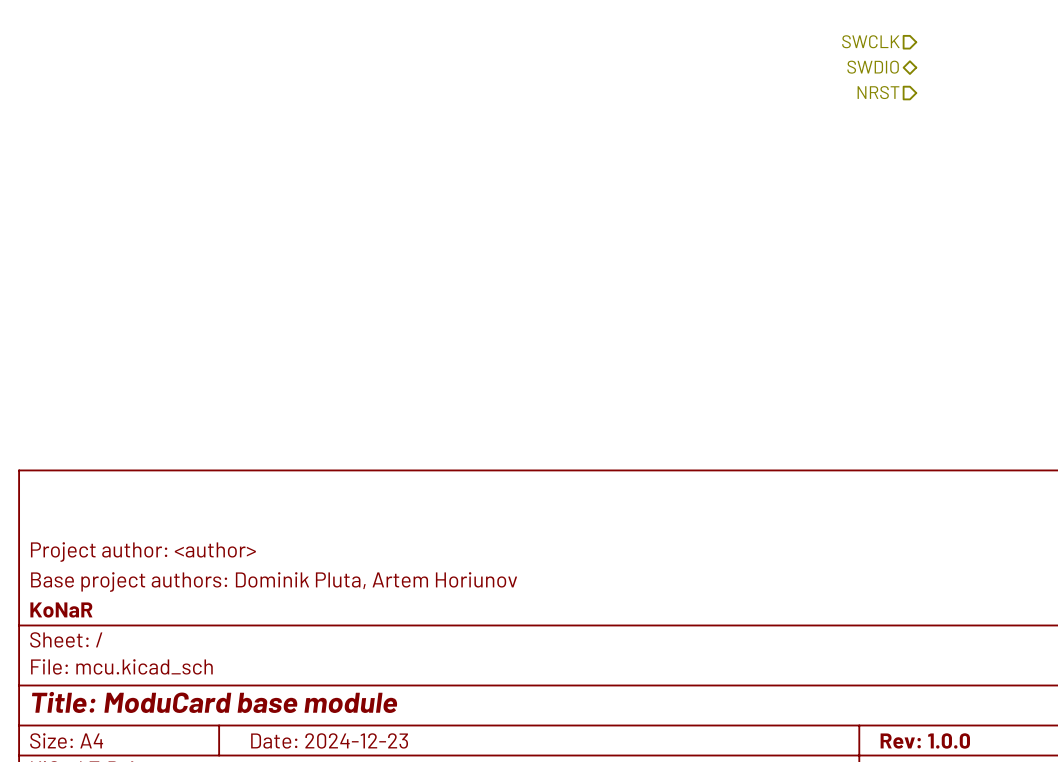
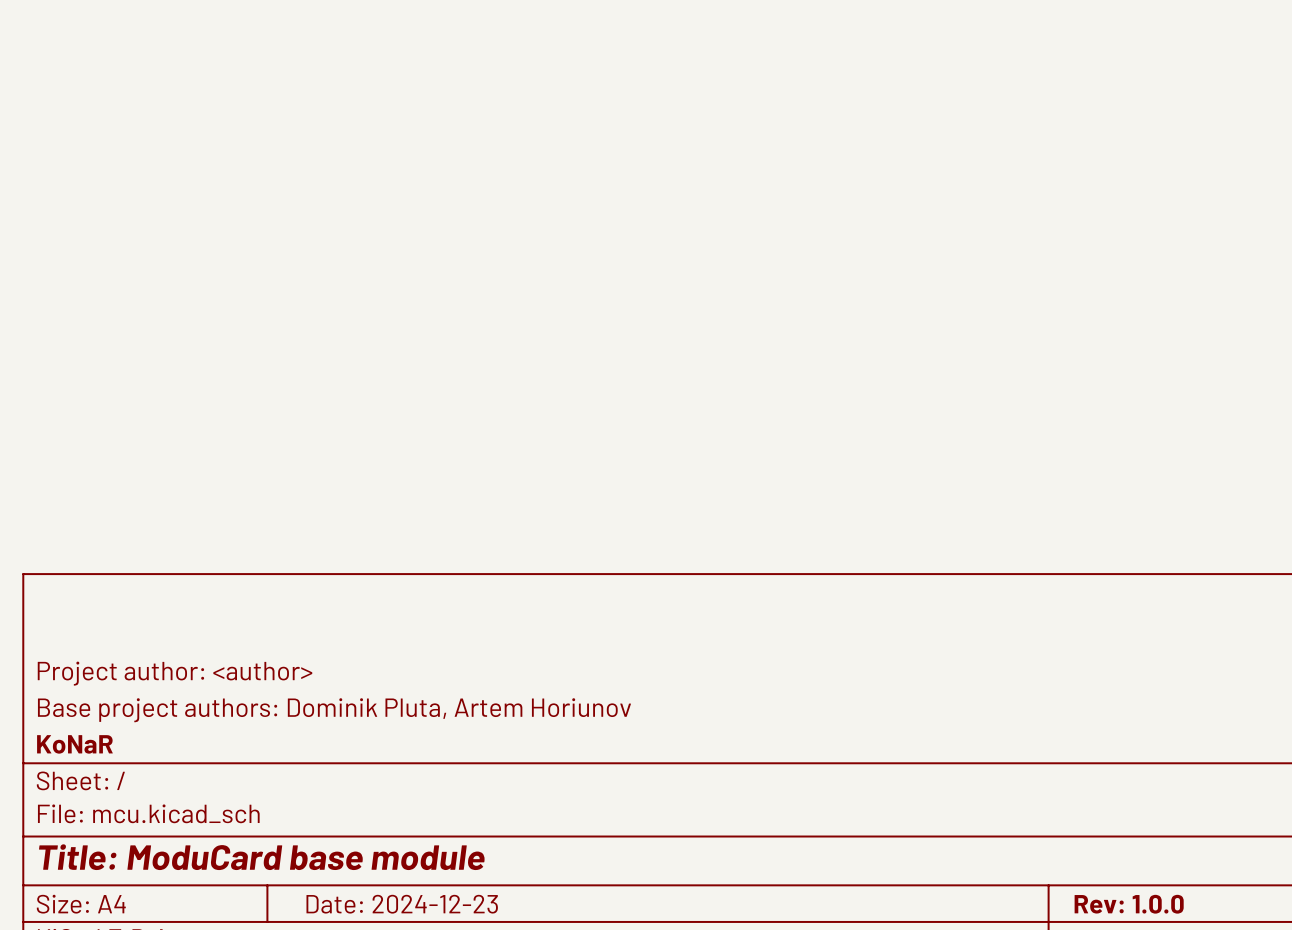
hierarchical label: SWCLK (870, 41) -> none
hierarchical label: SWDIO (873, 67) -> none
hierarchical label: NRST (878, 92) -> none

